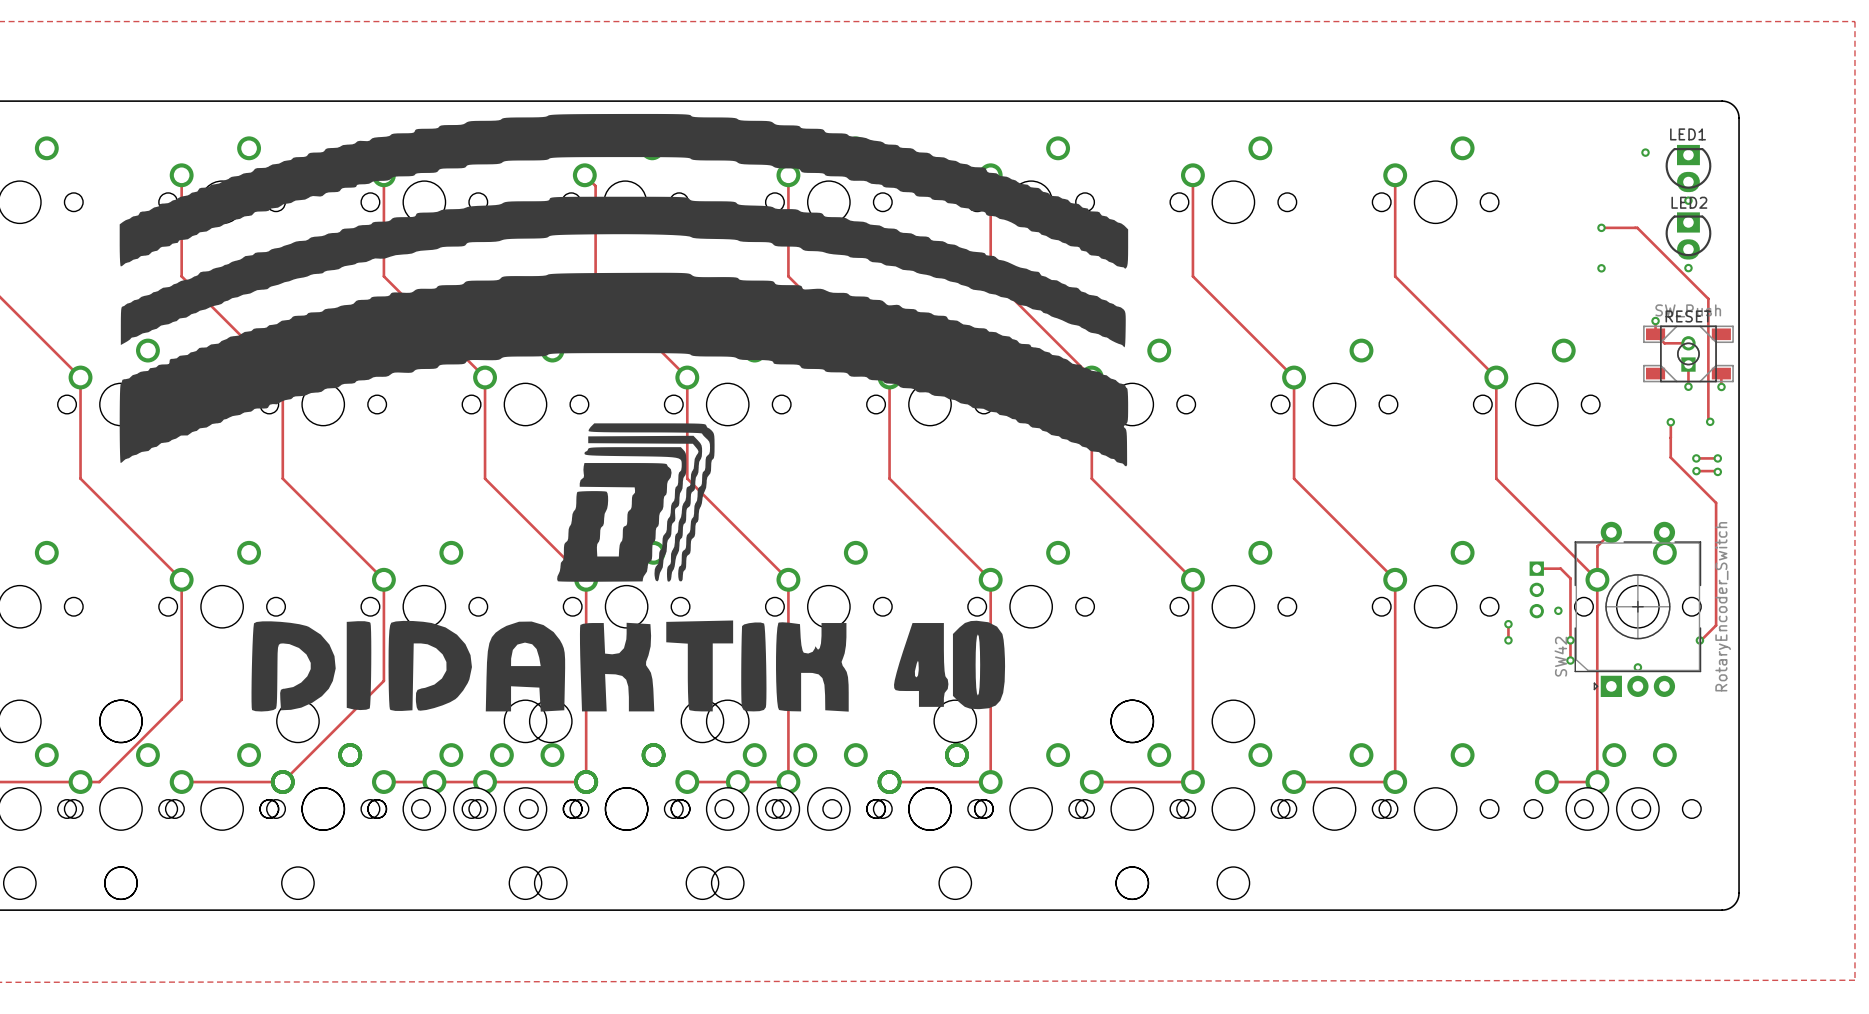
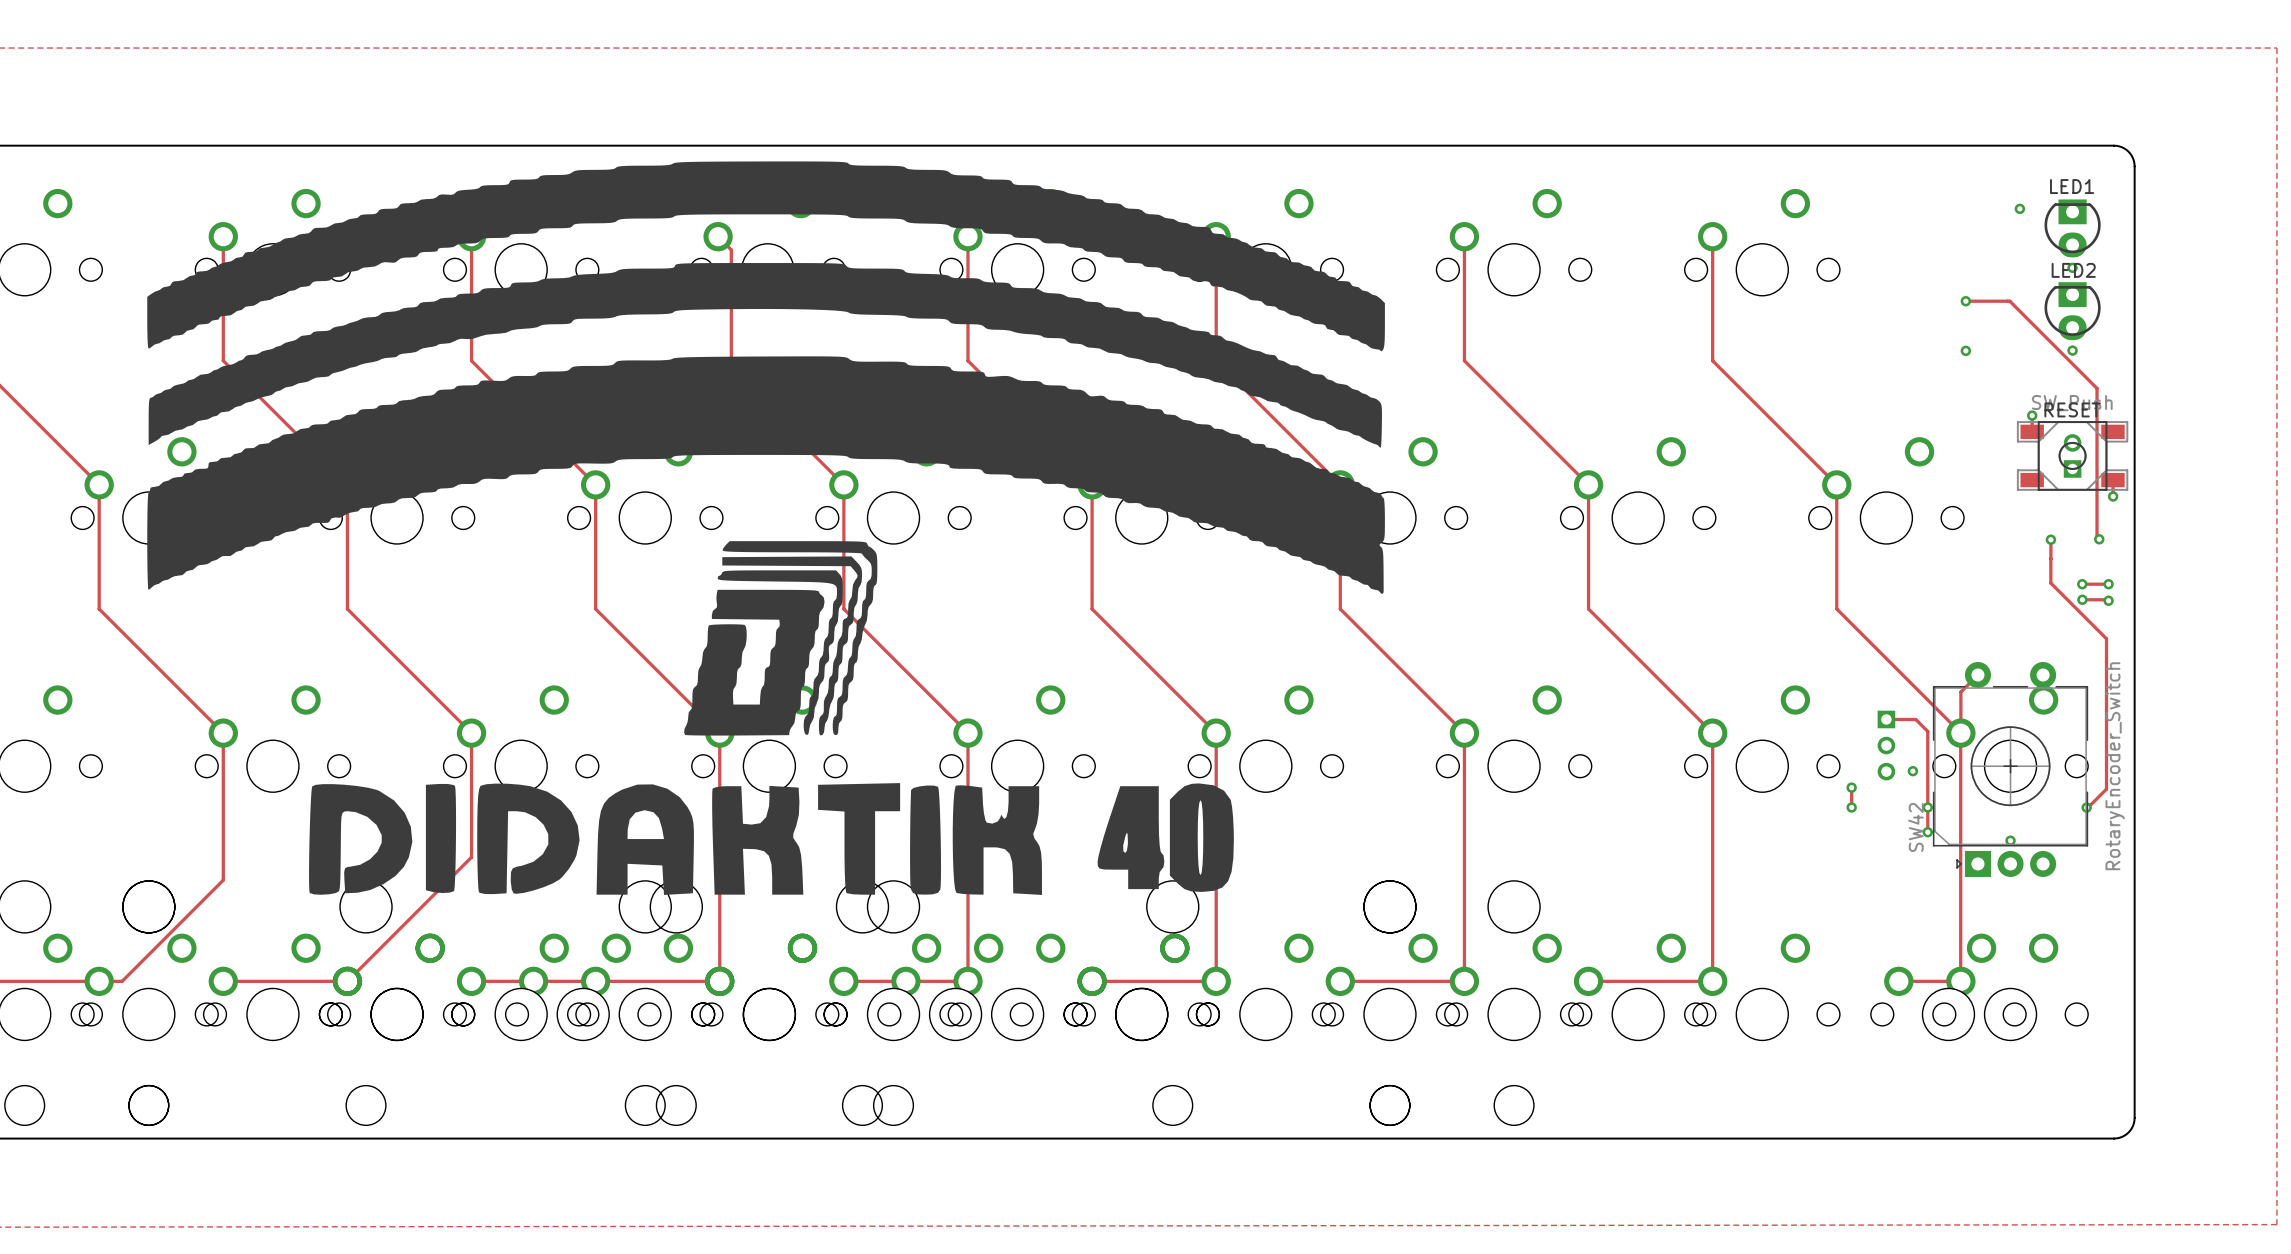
track: (1655, 334) (1664, 343) (1688, 343) -> none
track: (1688, 364) (1688, 386) -> none
via: (1688, 386) -> none

